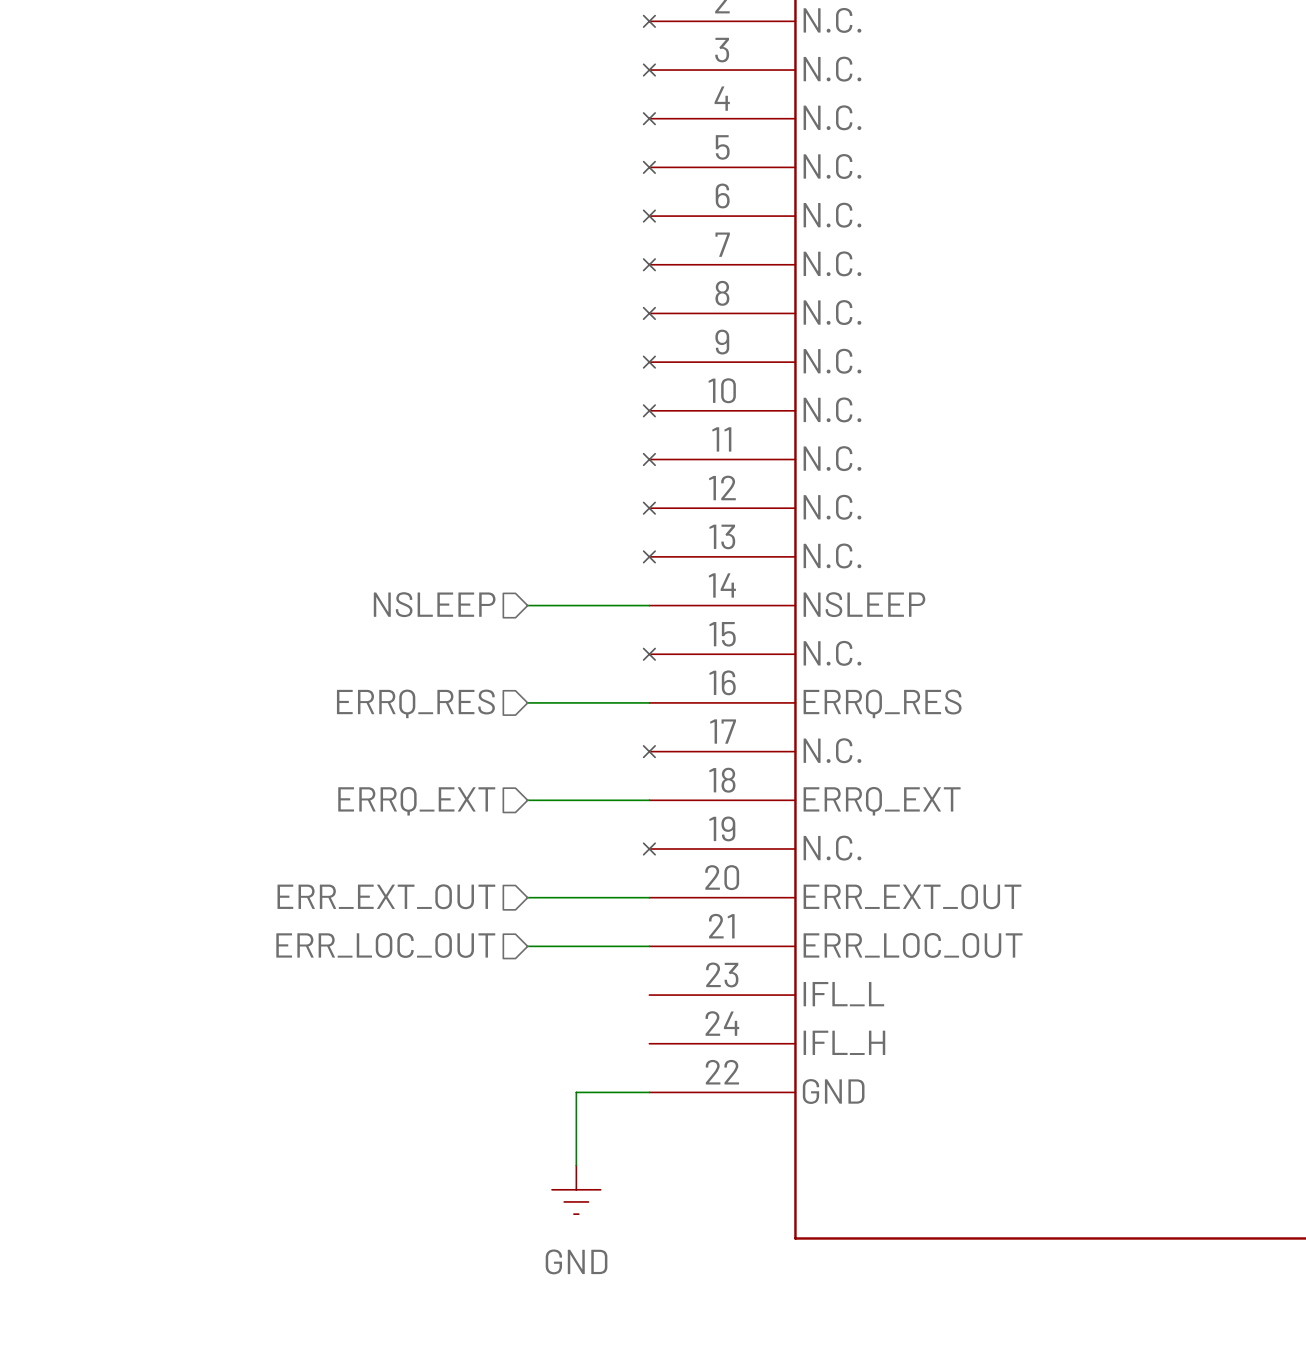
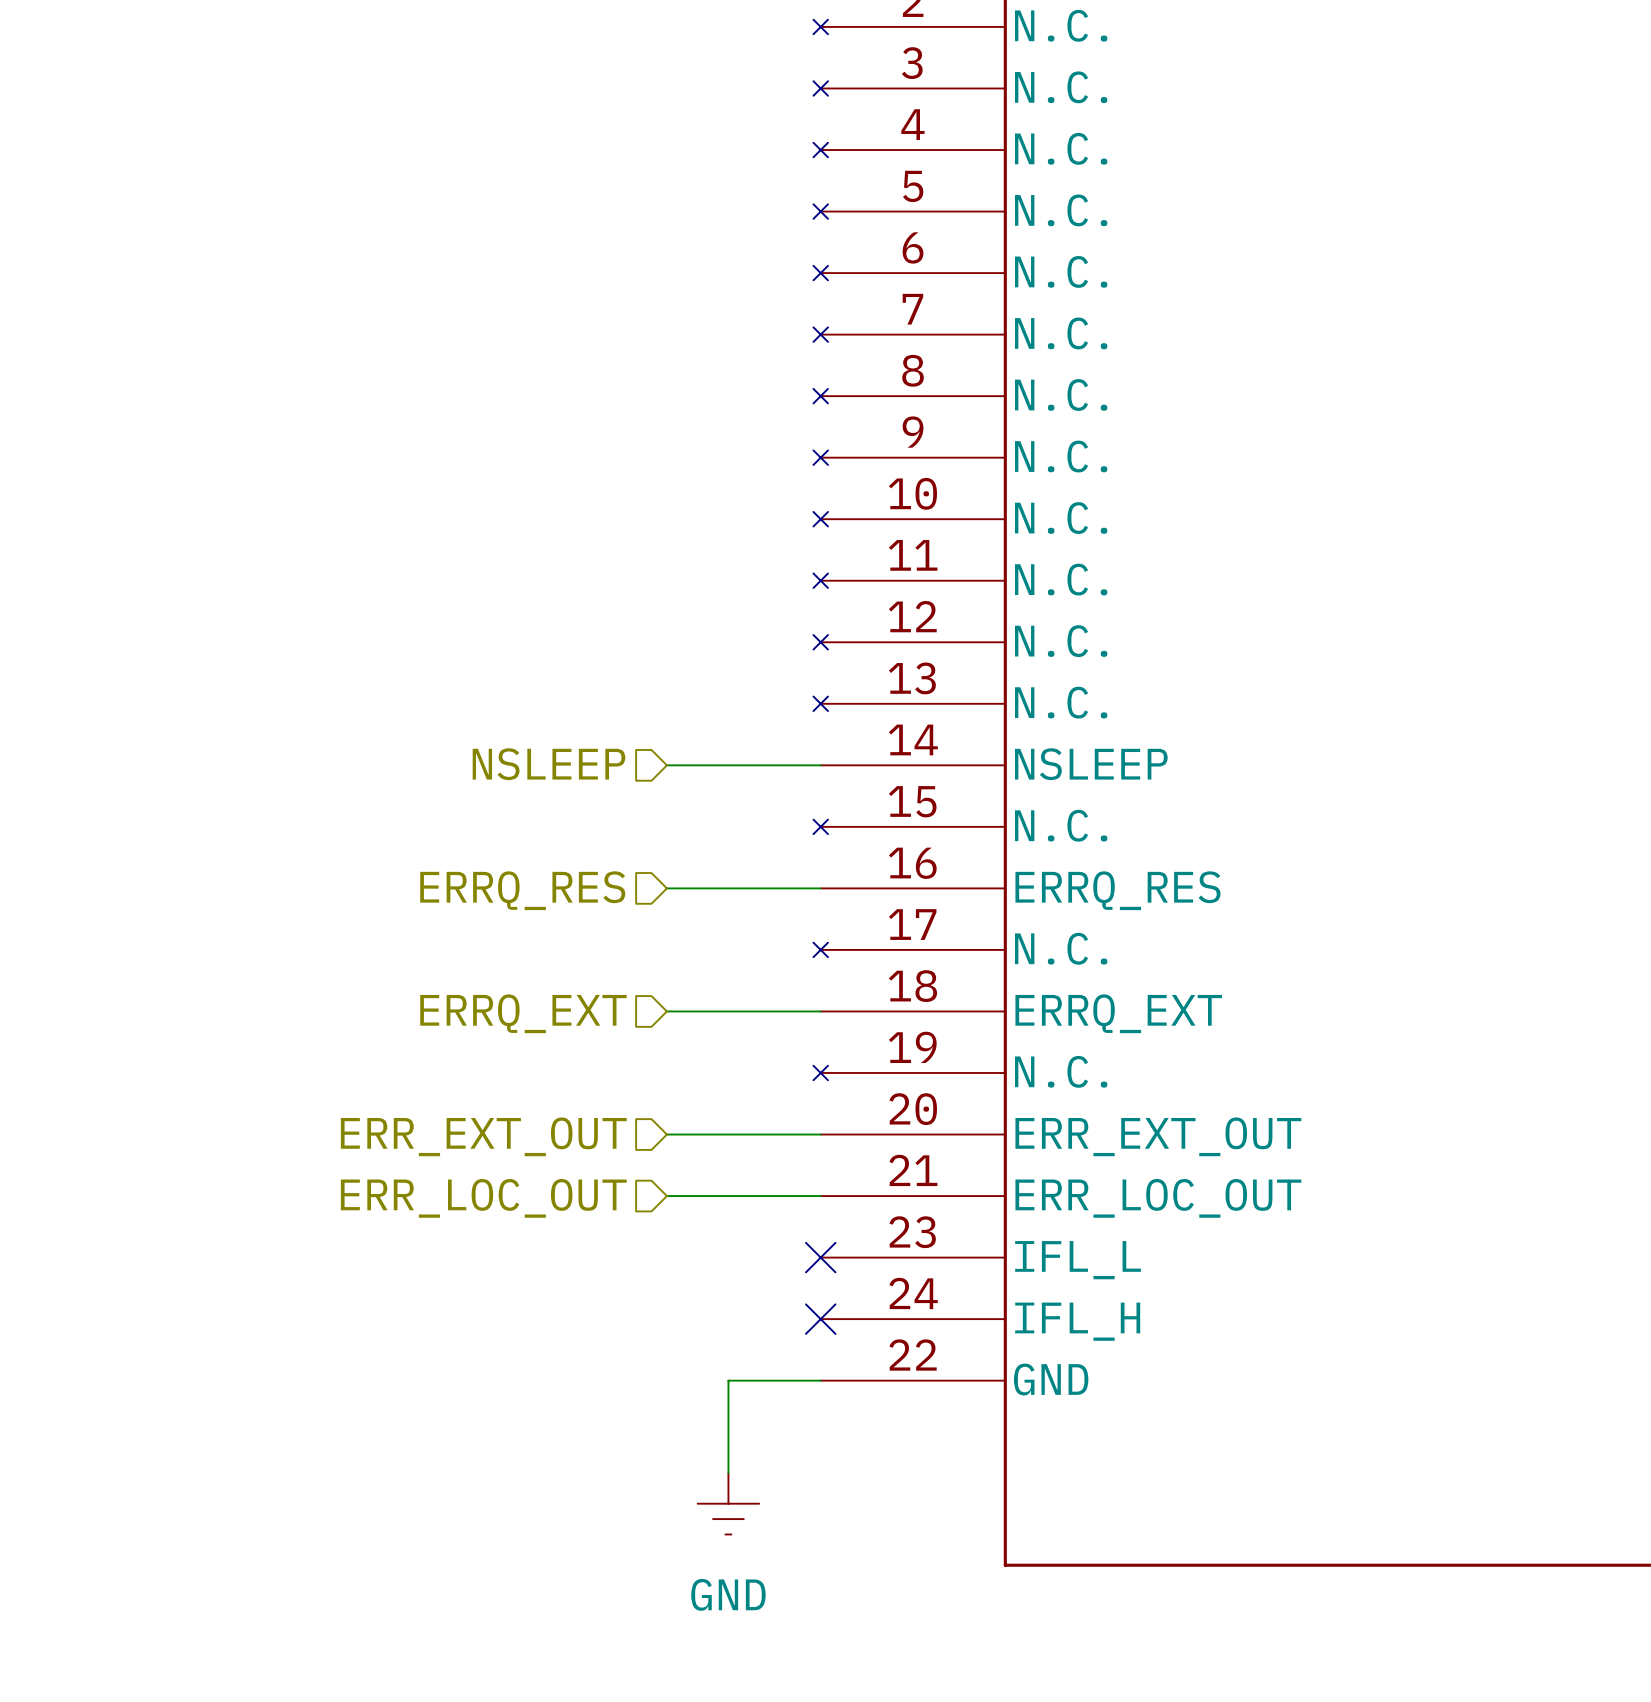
no-connect mark: none -> (820, 1257)
no-connect mark: none -> (820, 1319)

